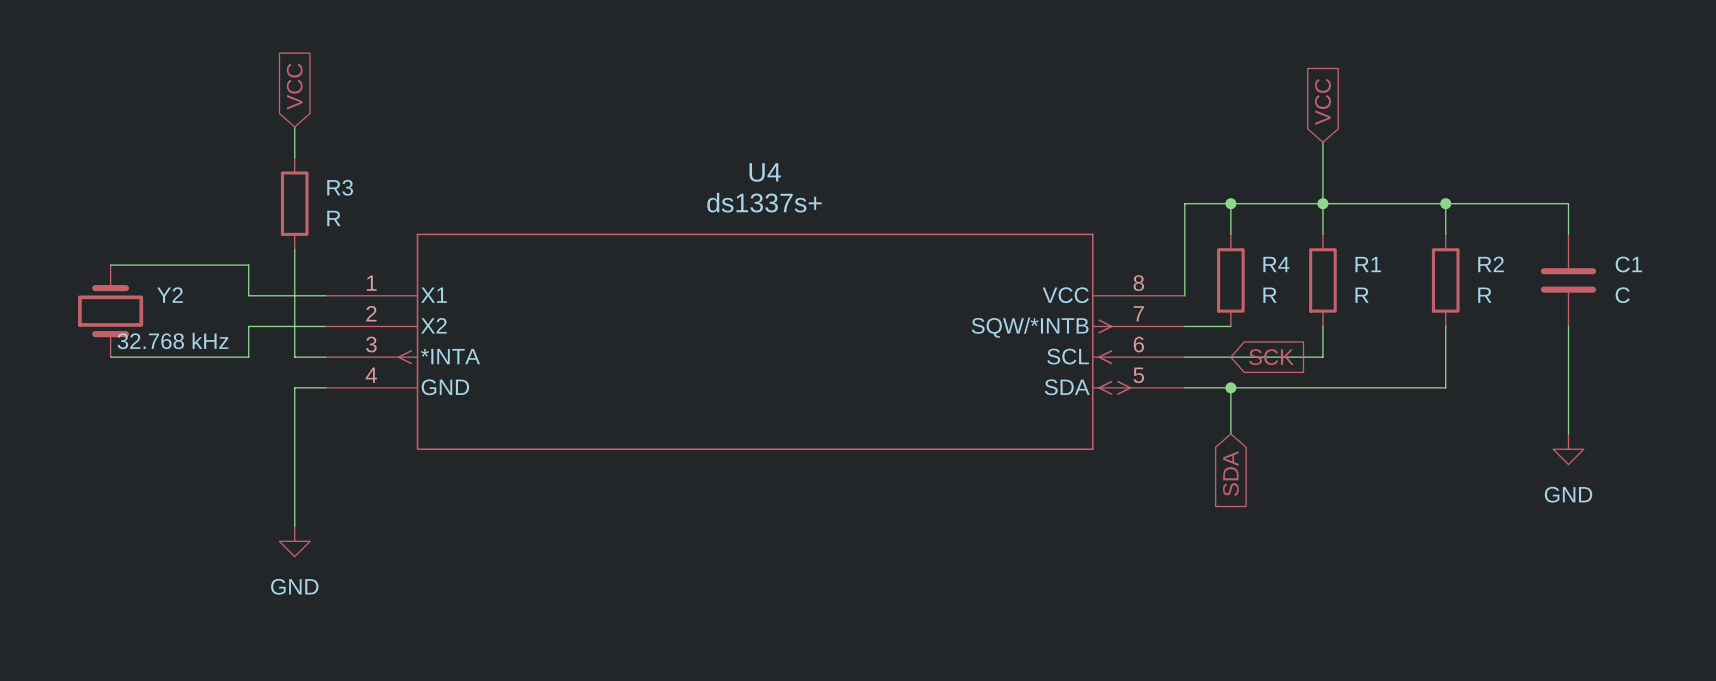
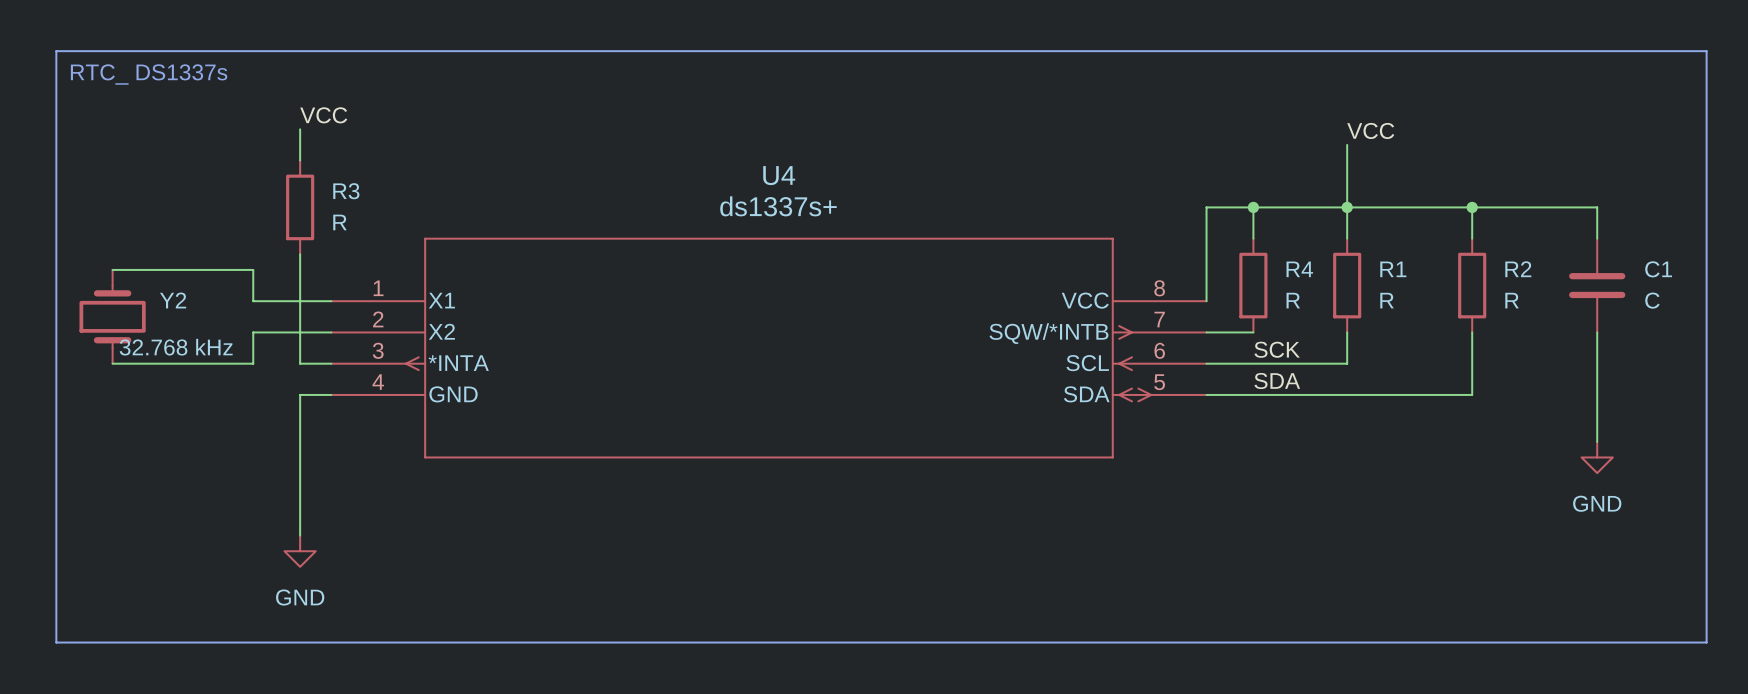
line: none -> (56, 51) (1706, 51) (1706, 642) (56, 642) (56, 51)
text: none -> RTC_ DS1337s (149, 74)
global label: VCC (294, 86) -> none
global label: VCC (1322, 101) -> none
label: none -> VCC (323, 115)
label: none -> VCC (1370, 130)
label: none -> SCK (1277, 349)
global label: SCK (1271, 357) -> none
label: none -> SDA (1277, 381)
wire: (1230, 387) (1230, 433) -> none
junction: (1230, 387) -> none
global label: SDA (1230, 473) -> none

